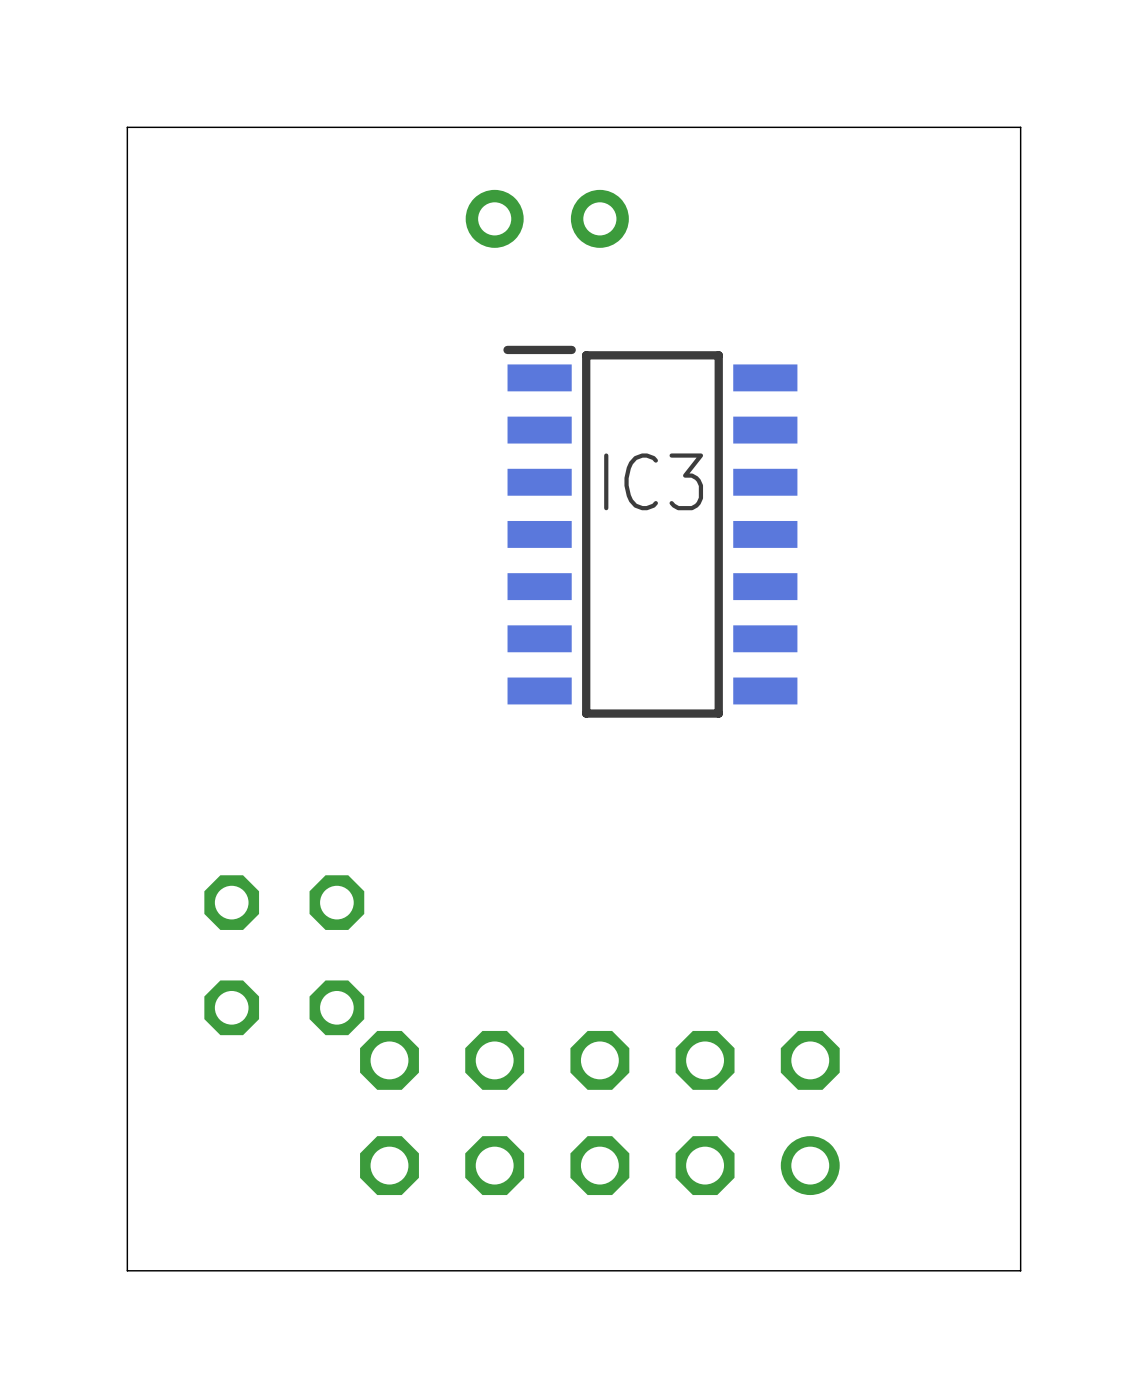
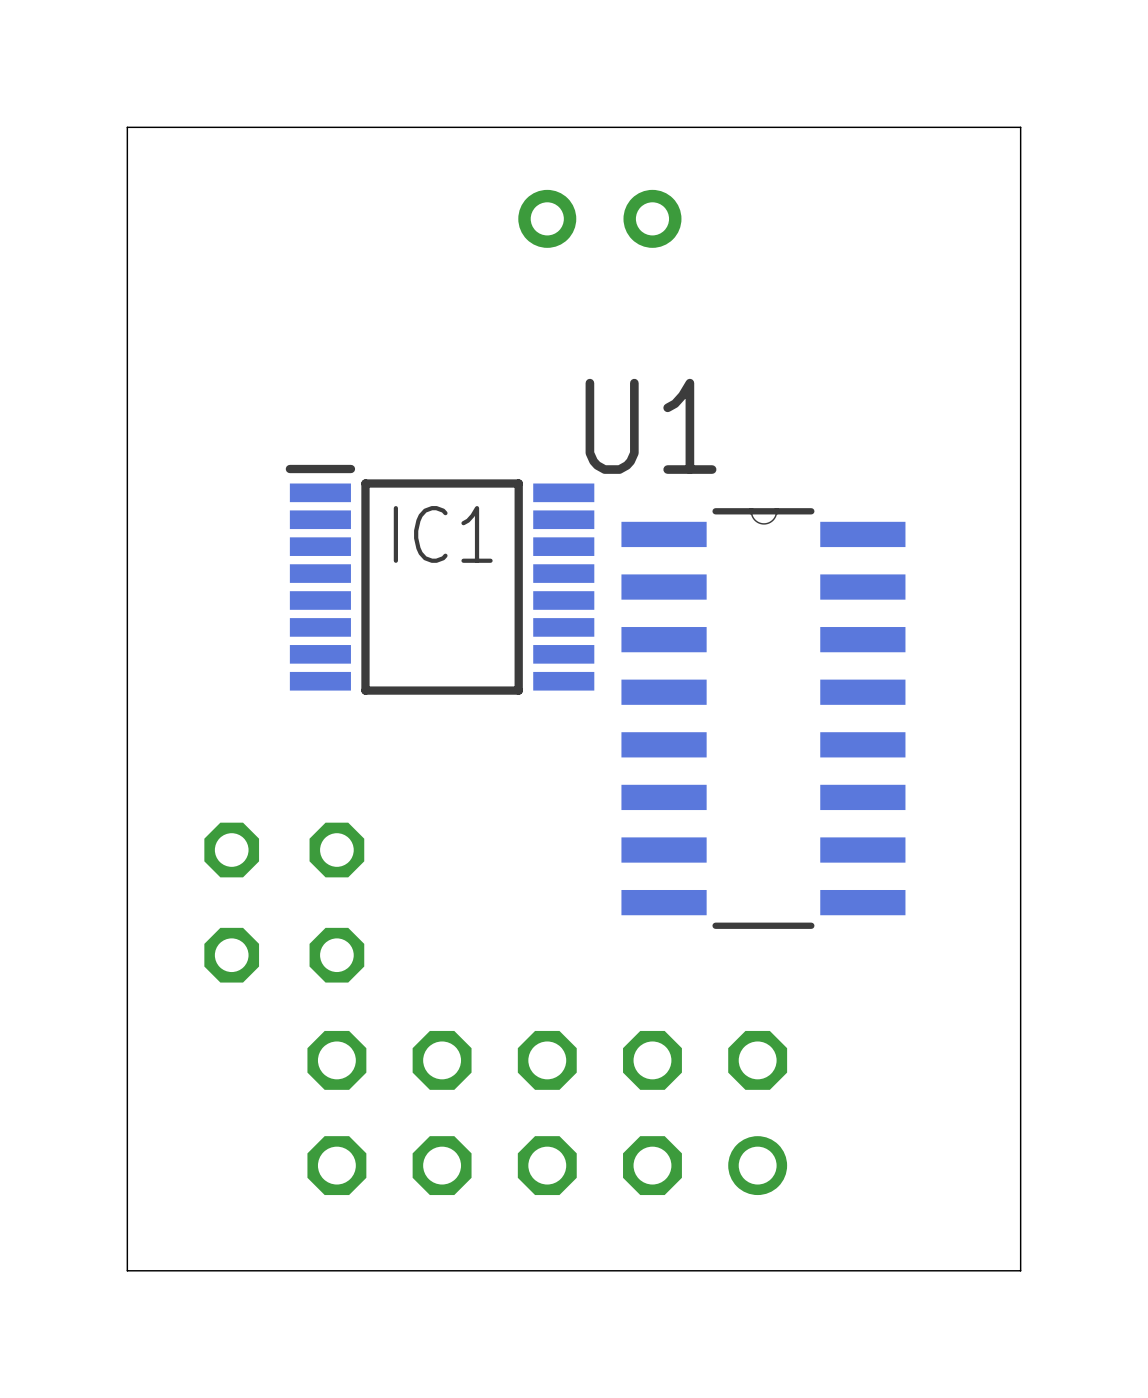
part position: (547, 218) -> (599, 218)
IC3: (650, 531) -> none
IC1: none -> (440, 579)
U1: none -> (763, 718)
part position: (284, 955) -> (284, 902)
part position: (599, 1113) -> (547, 1113)

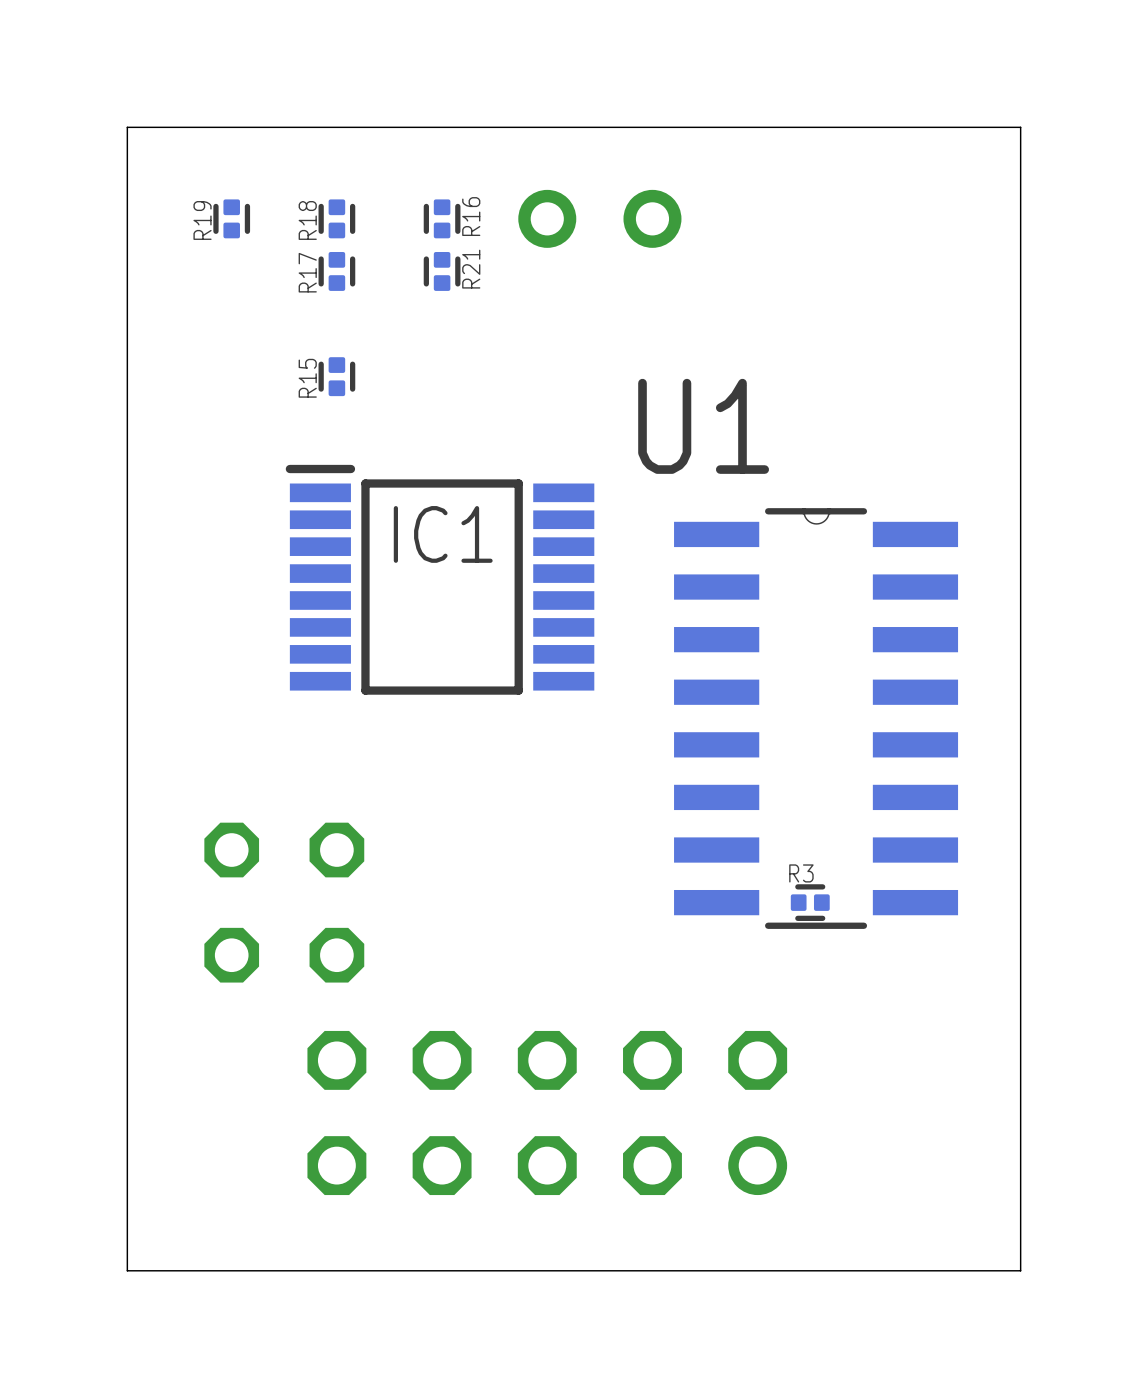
R19: none -> (231, 218)
R18: none -> (336, 218)
R16: none -> (442, 218)
R17: none -> (336, 271)
R21: none -> (442, 271)
R15: none -> (336, 376)
U1 position: (763, 718) -> (816, 718)
R3: none -> (810, 902)

